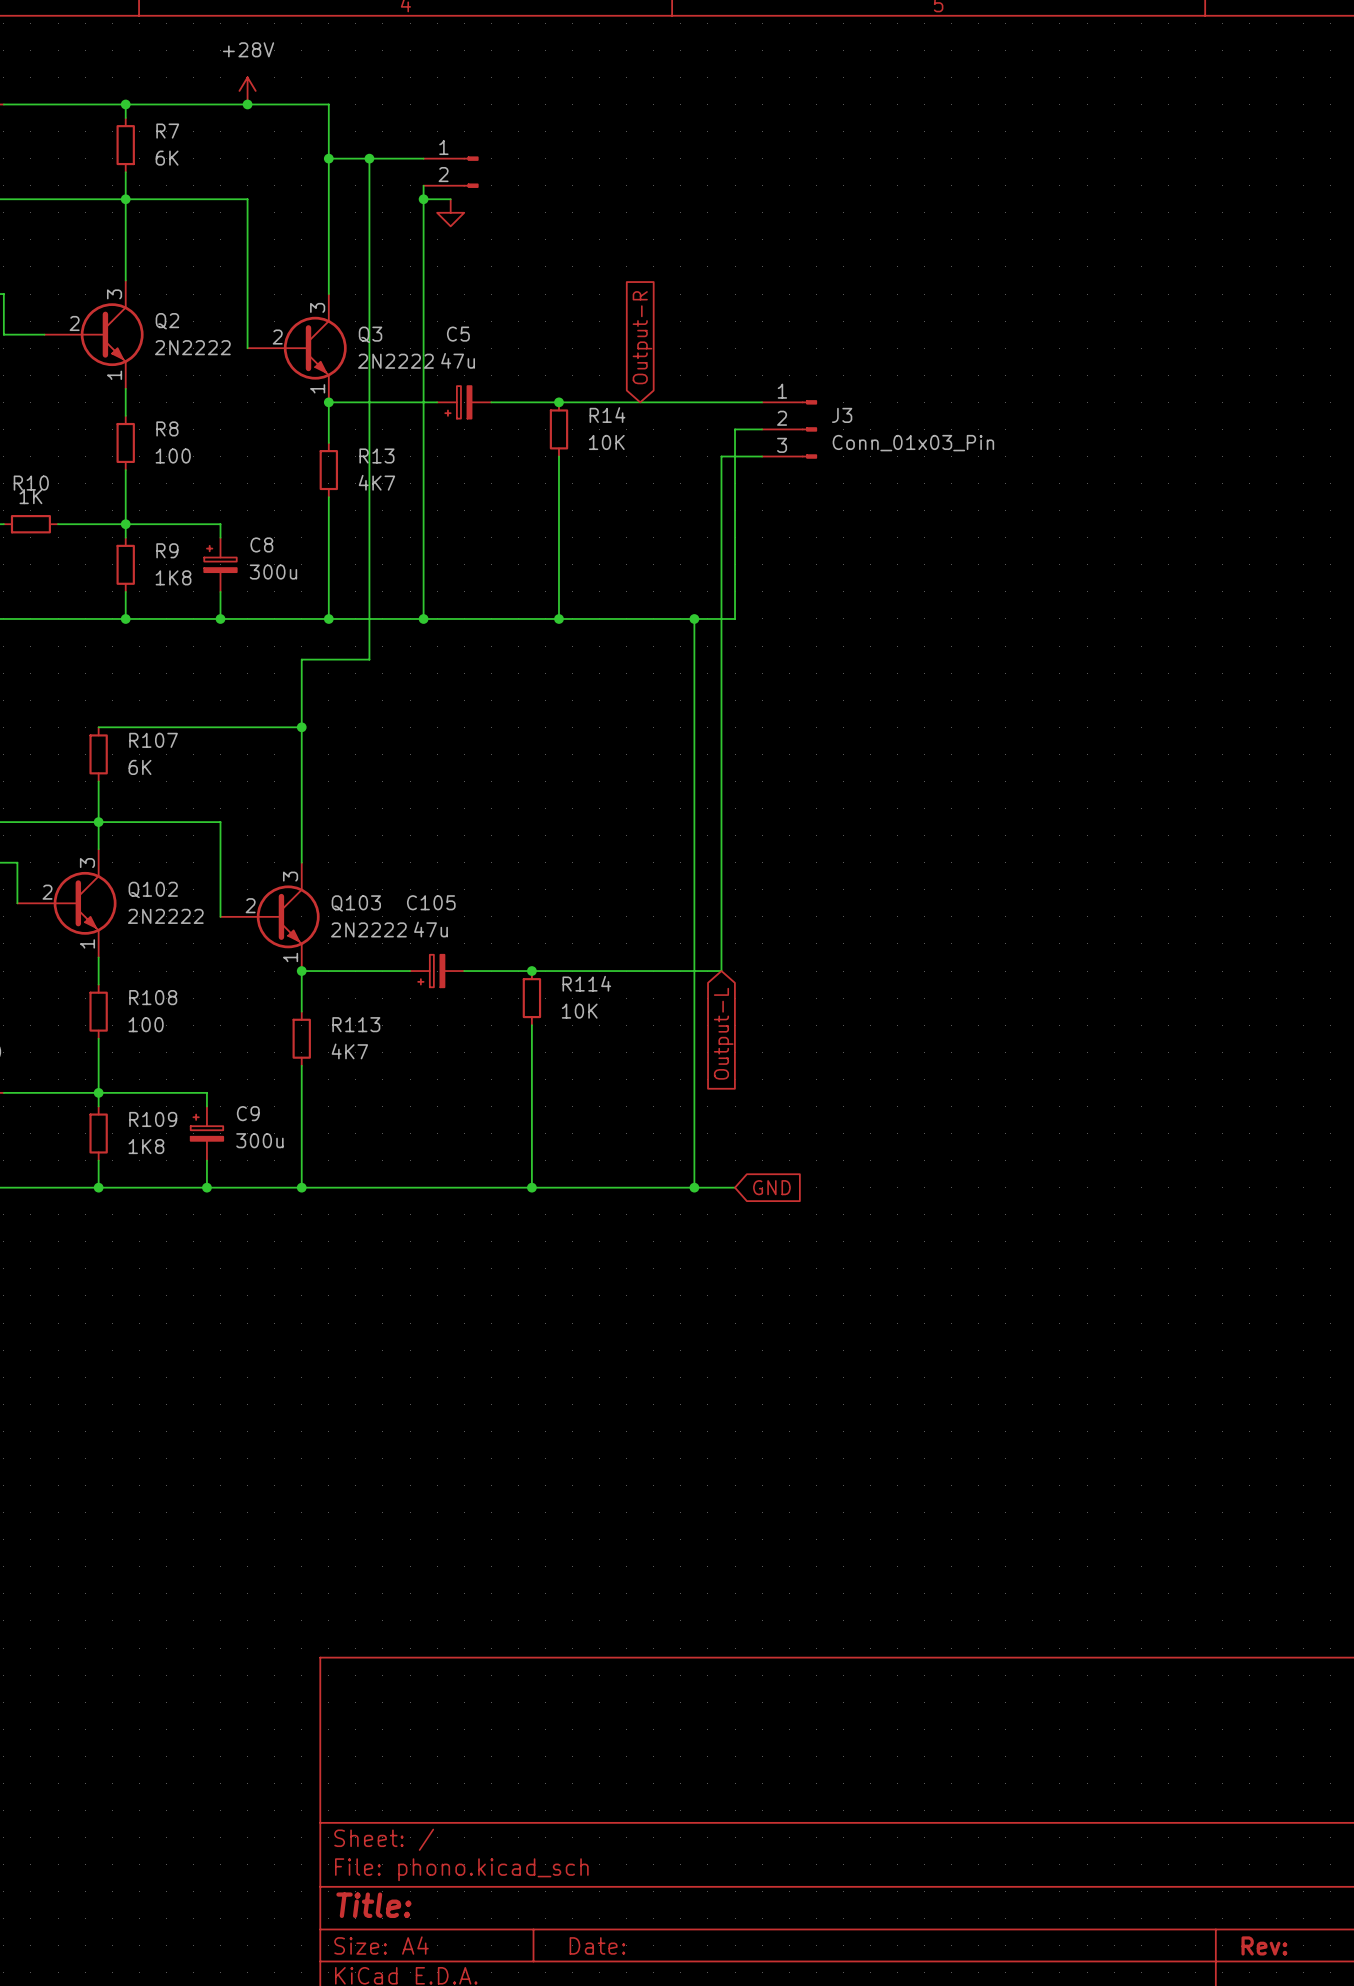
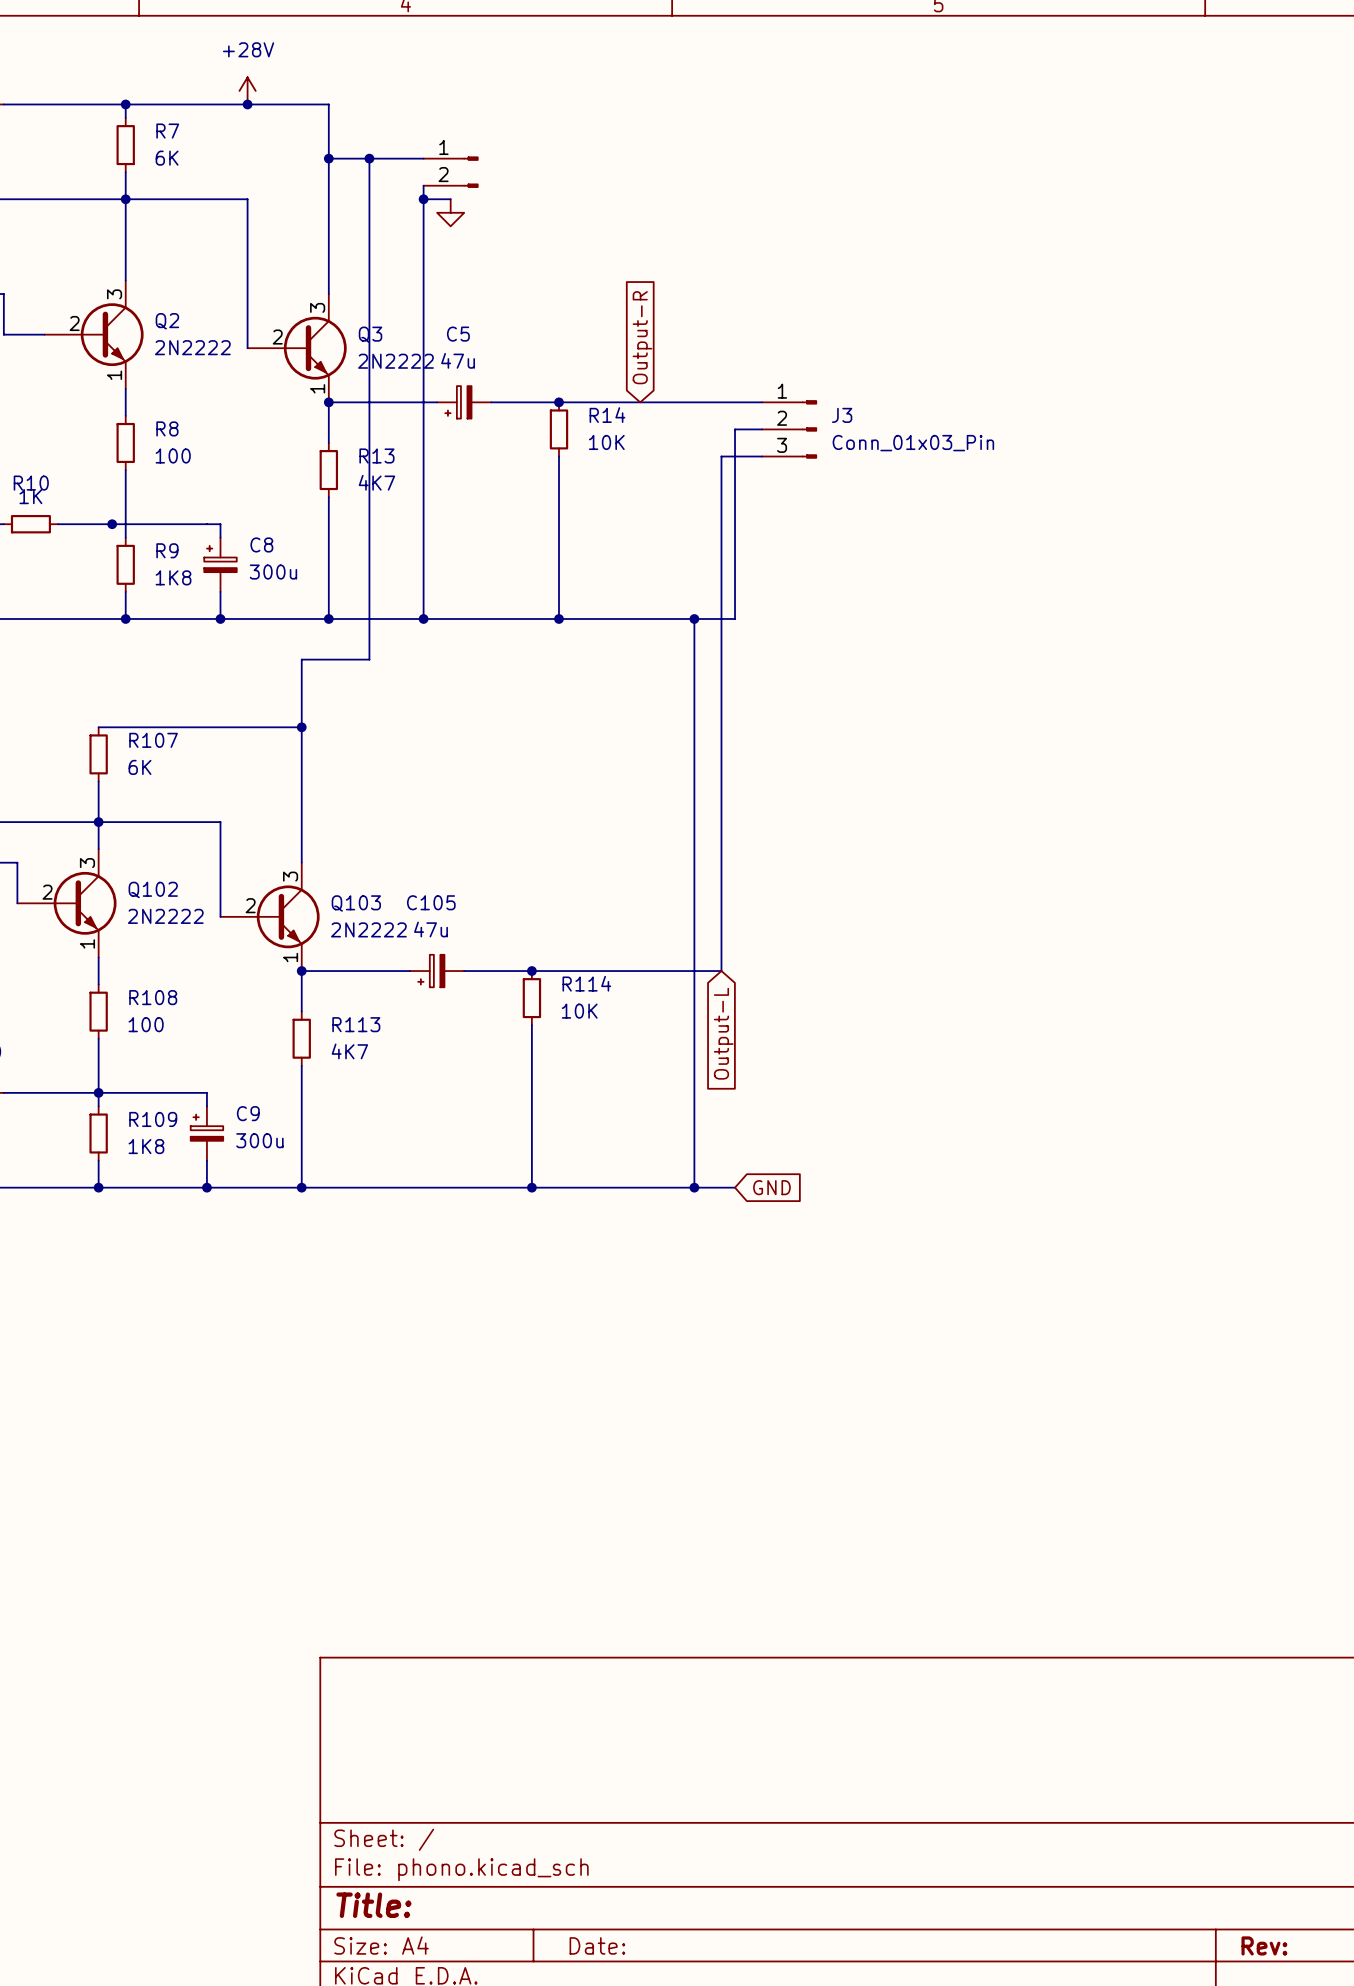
junction position: (125, 524) -> (112, 524)

